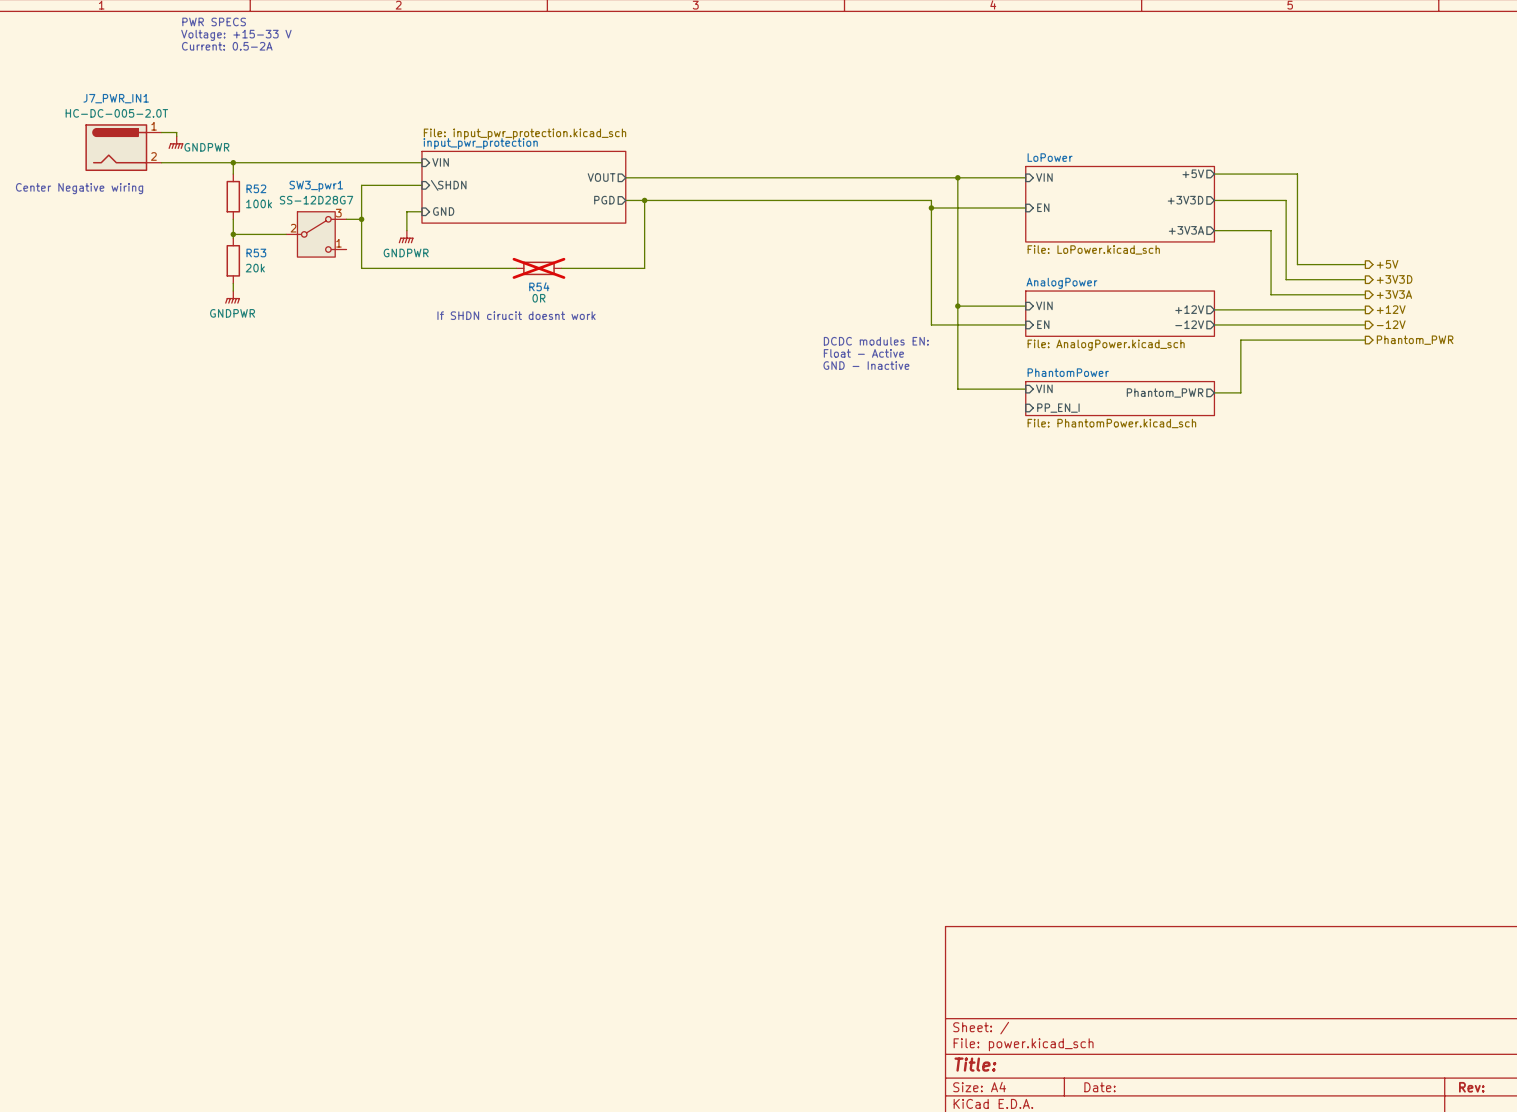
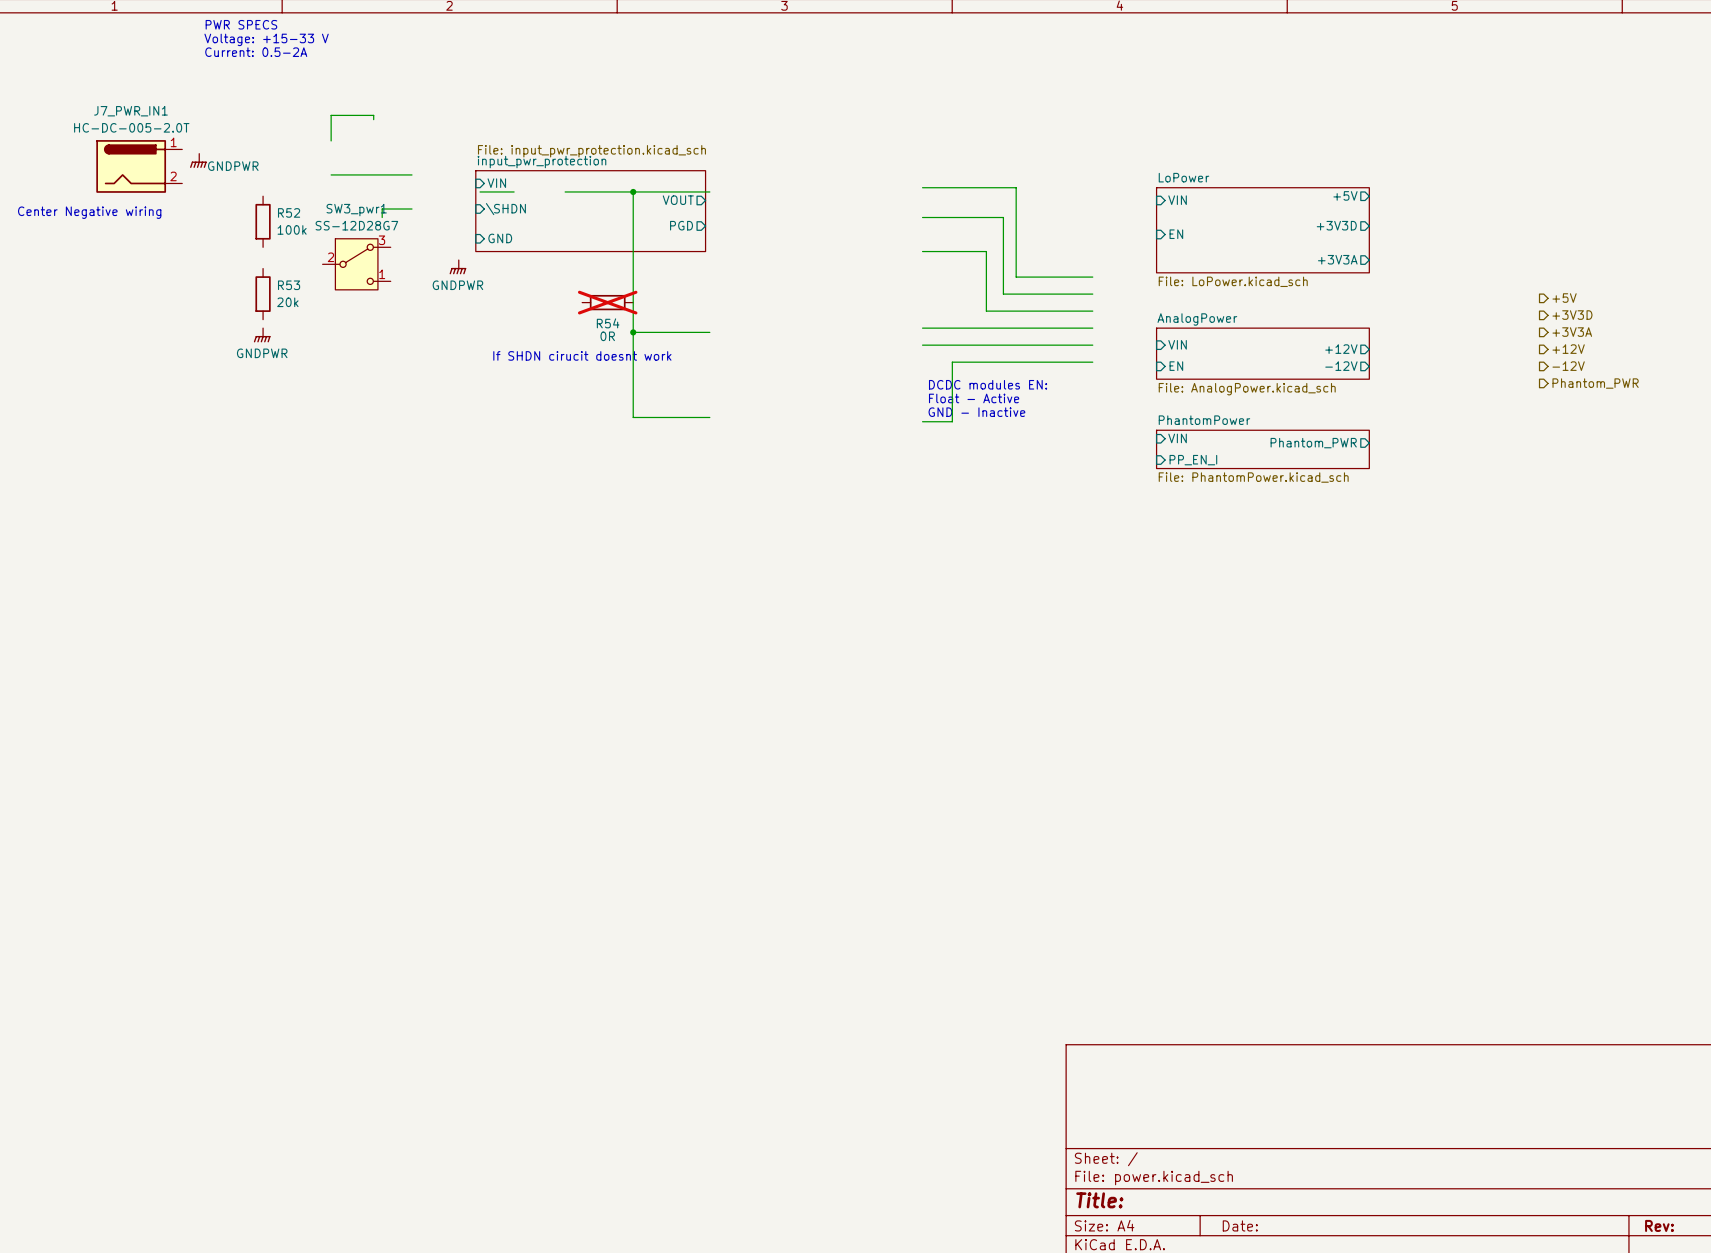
wire: none -> (373, 119) (373, 115) (331, 115) (331, 140)
wire: (161, 132) (176, 132) (176, 136) -> none
wire: none -> (331, 174) (411, 174)
wire: (161, 162) (421, 162) -> none
wire: (233, 162) (233, 174) -> none
junction: (233, 162) -> none
wire: none -> (922, 187) (1016, 187) (1016, 277) (1092, 277)
wire: none -> (480, 191) (514, 191)
wire: none -> (565, 191) (709, 191)
wire: none -> (633, 191) (633, 417) (709, 417)
junction: none -> (633, 191)
wire: (1214, 174) (1297, 174) (1297, 264) (1365, 264) -> none
wire: (625, 177) (1025, 177) -> none
wire: (957, 177) (957, 389) (1025, 389) -> none
junction: (957, 177) -> none
wire: (361, 185) (361, 268) (516, 268) -> (407, 209) (382, 209) (382, 217)
wire: (365, 185) (421, 185) -> none
wire: none -> (922, 217) (1003, 217) (1003, 294) (1092, 294)
wire: (625, 200) (931, 200) (931, 324) (1025, 324) -> none
wire: (644, 200) (644, 268) (561, 268) -> none
junction: (644, 200) -> none
wire: (1214, 200) (1286, 200) (1286, 279) (1365, 279) -> none
wire: (931, 208) (1025, 208) -> none
junction: (931, 208) -> none
wire: (421, 211) (406, 211) (406, 230) -> none
wire: (233, 219) (233, 238) -> none
wire: (346, 219) (361, 219) -> none
junction: (361, 219) -> none
wire: none -> (922, 251) (986, 251) (986, 311) (1092, 311)
wire: (1214, 230) (1271, 230) (1271, 294) (1365, 294) -> none
wire: (233, 234) (286, 234) -> none
junction: (233, 234) -> none
wire: (233, 283) (233, 291) -> none
wire: none -> (922, 328) (1092, 328)
wire: none -> (633, 332) (709, 332)
junction: none -> (633, 332)
wire: none -> (922, 345) (1079, 345)
junction: (957, 306) -> none
wire: (969, 306) (1025, 306) -> none
wire: (1214, 309) (1365, 309) -> none
wire: none -> (1092, 362) (952, 362) (952, 421) (922, 421)
wire: (1214, 324) (1365, 324) -> none
wire: (1365, 340) (1240, 340) (1240, 392) (1214, 392) -> none

